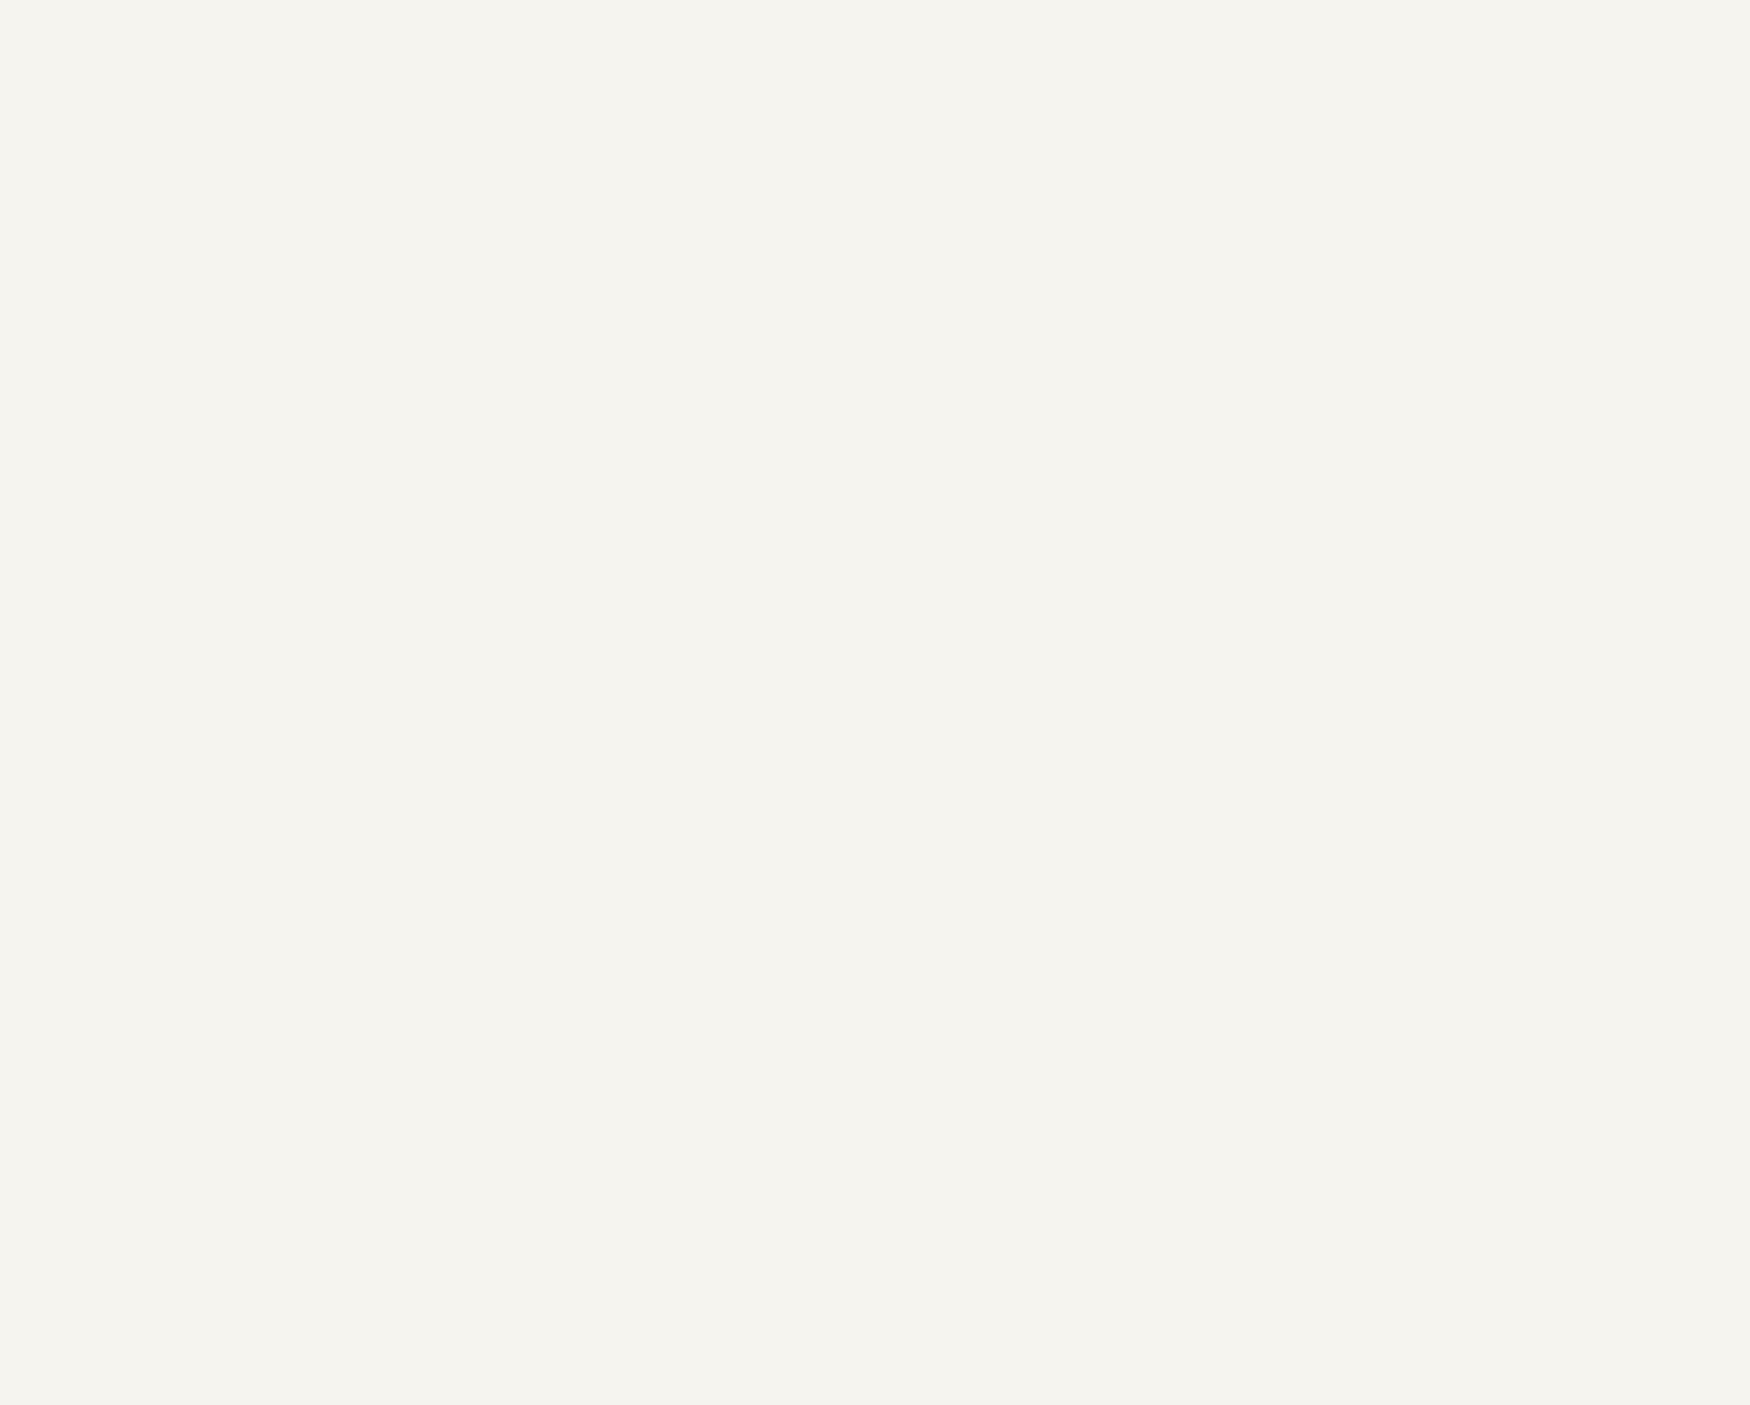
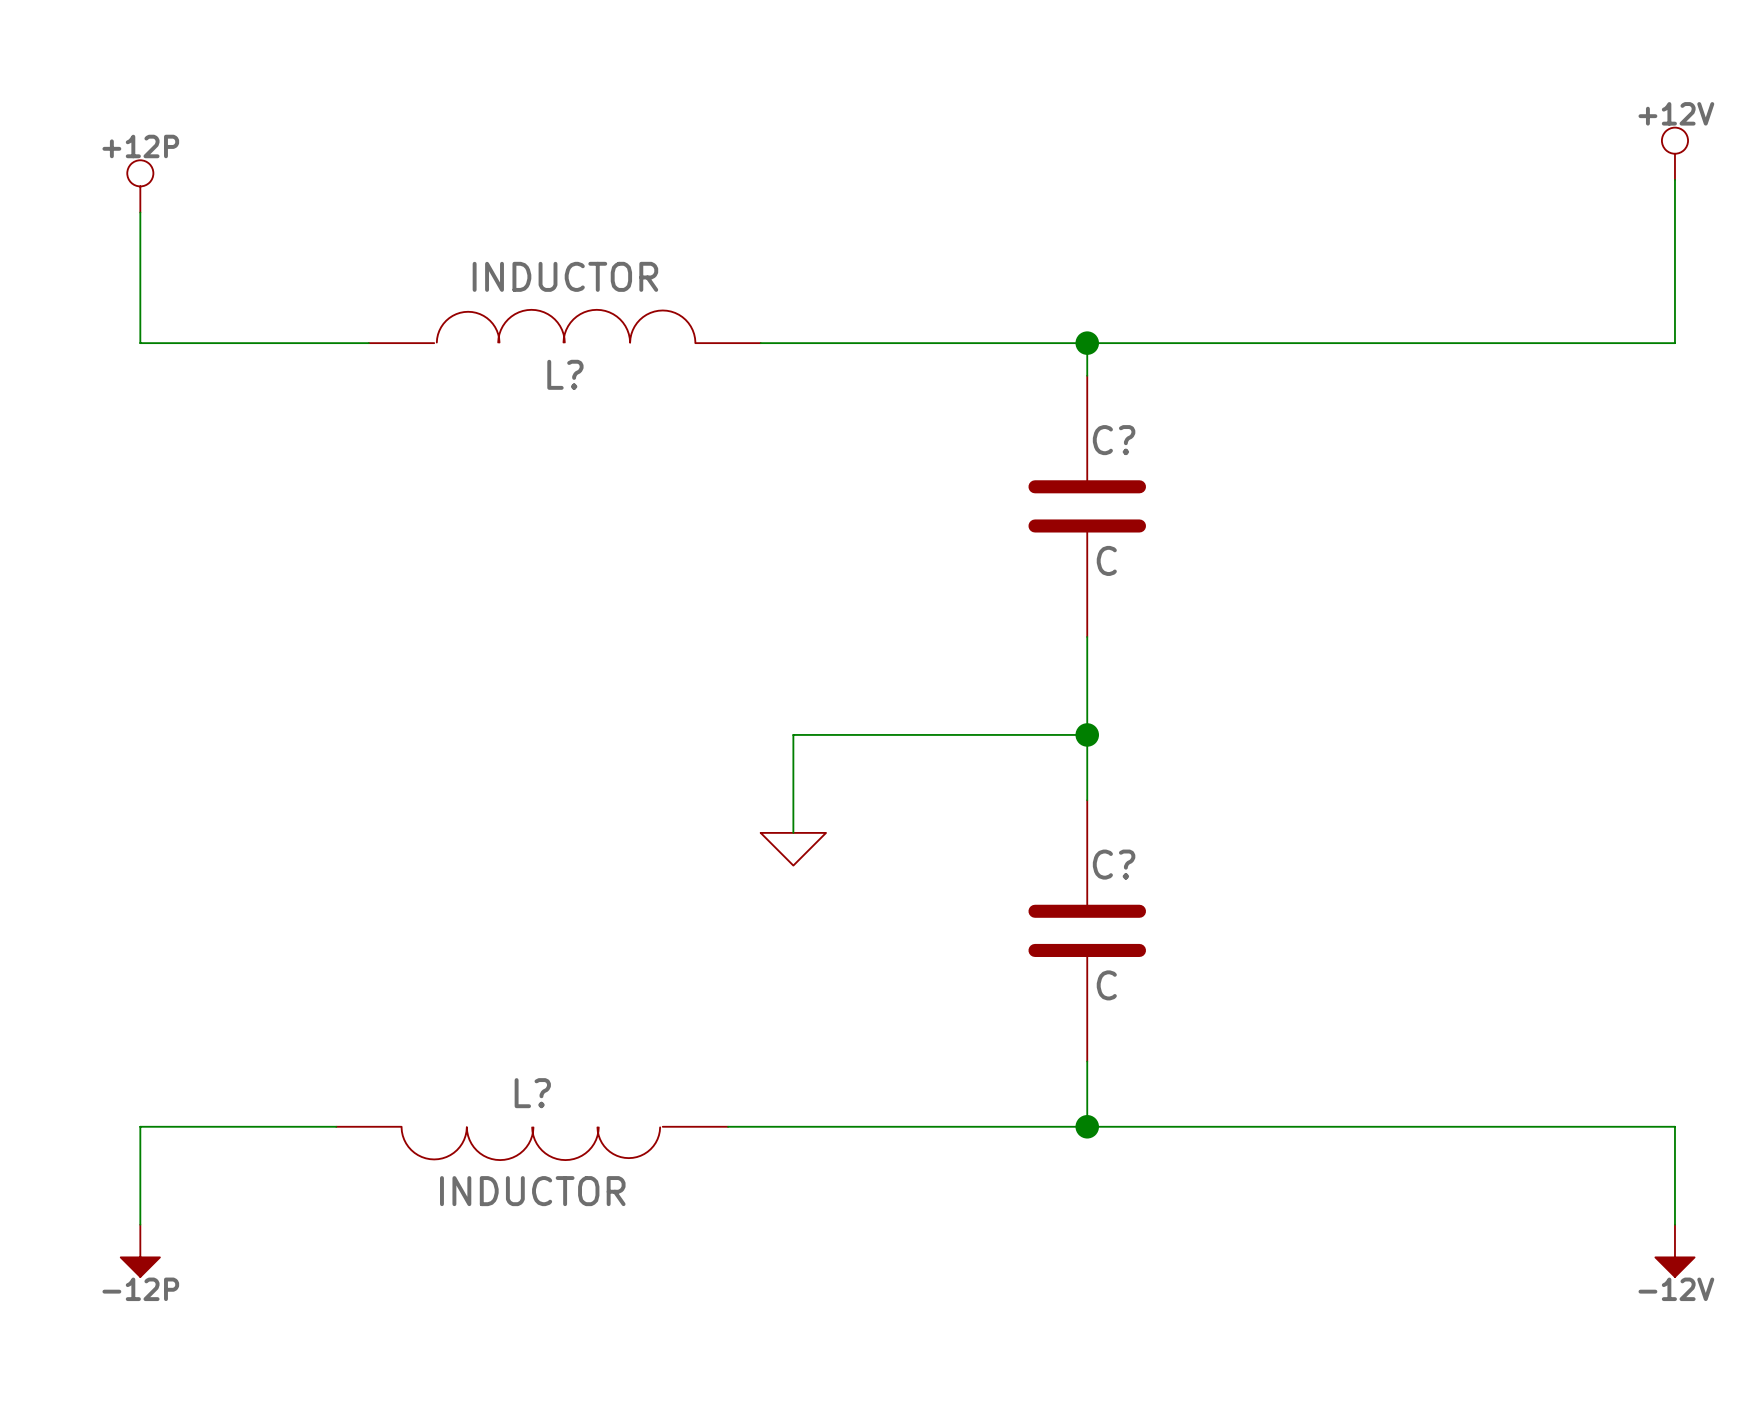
power symbol: none -> +12V (1674, 153)
wire: none -> (1674, 179) (1674, 343) (760, 343)
power symbol: none -> +12P (140, 186)
wire: none -> (140, 212) (140, 343) (368, 343)
L?: none -> INDUCTOR (564, 326)
wire: none -> (1087, 343) (1087, 375)
junction: none -> (1087, 343)
C?: none -> C (1087, 506)
wire: none -> (1087, 637) (1087, 800)
wire: none -> (1087, 734) (793, 734) (793, 832)
junction: none -> (1087, 734)
power symbol: none -> (793, 849)
C?: none -> C (1087, 930)
wire: none -> (1087, 1061) (1087, 1126)
wire: none -> (336, 1126) (140, 1126) (140, 1224)
wire: none -> (728, 1126) (1674, 1126) (1674, 1224)
junction: none -> (1087, 1126)
L?: none -> INDUCTOR (532, 1143)
power symbol: none -> -12P (140, 1250)
power symbol: none -> -12V (1674, 1250)

